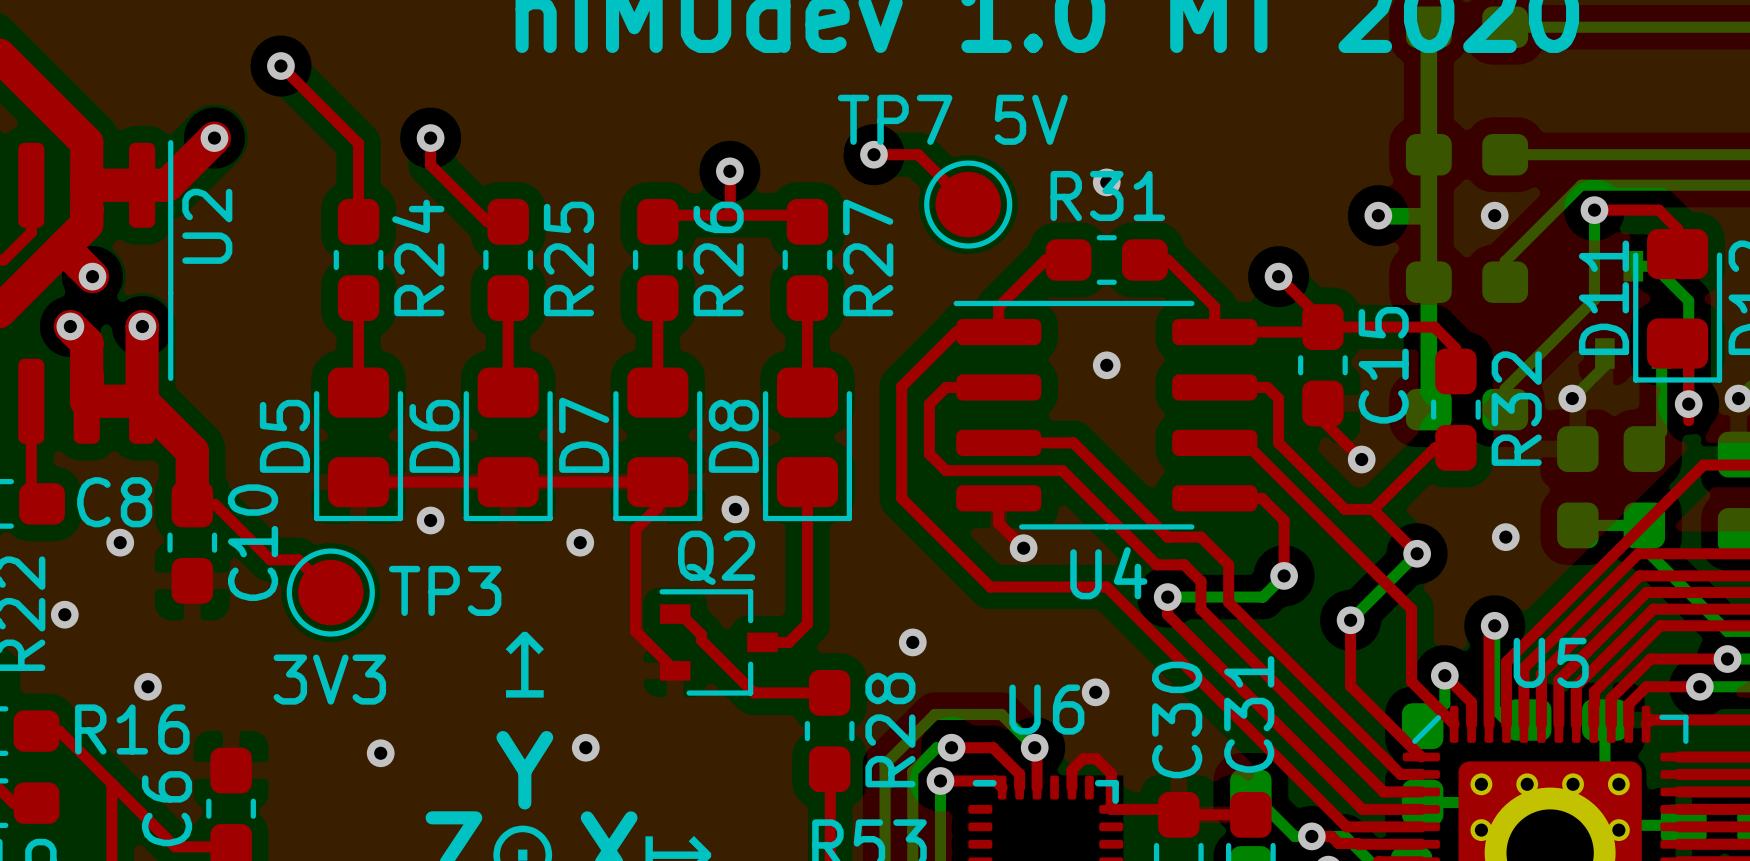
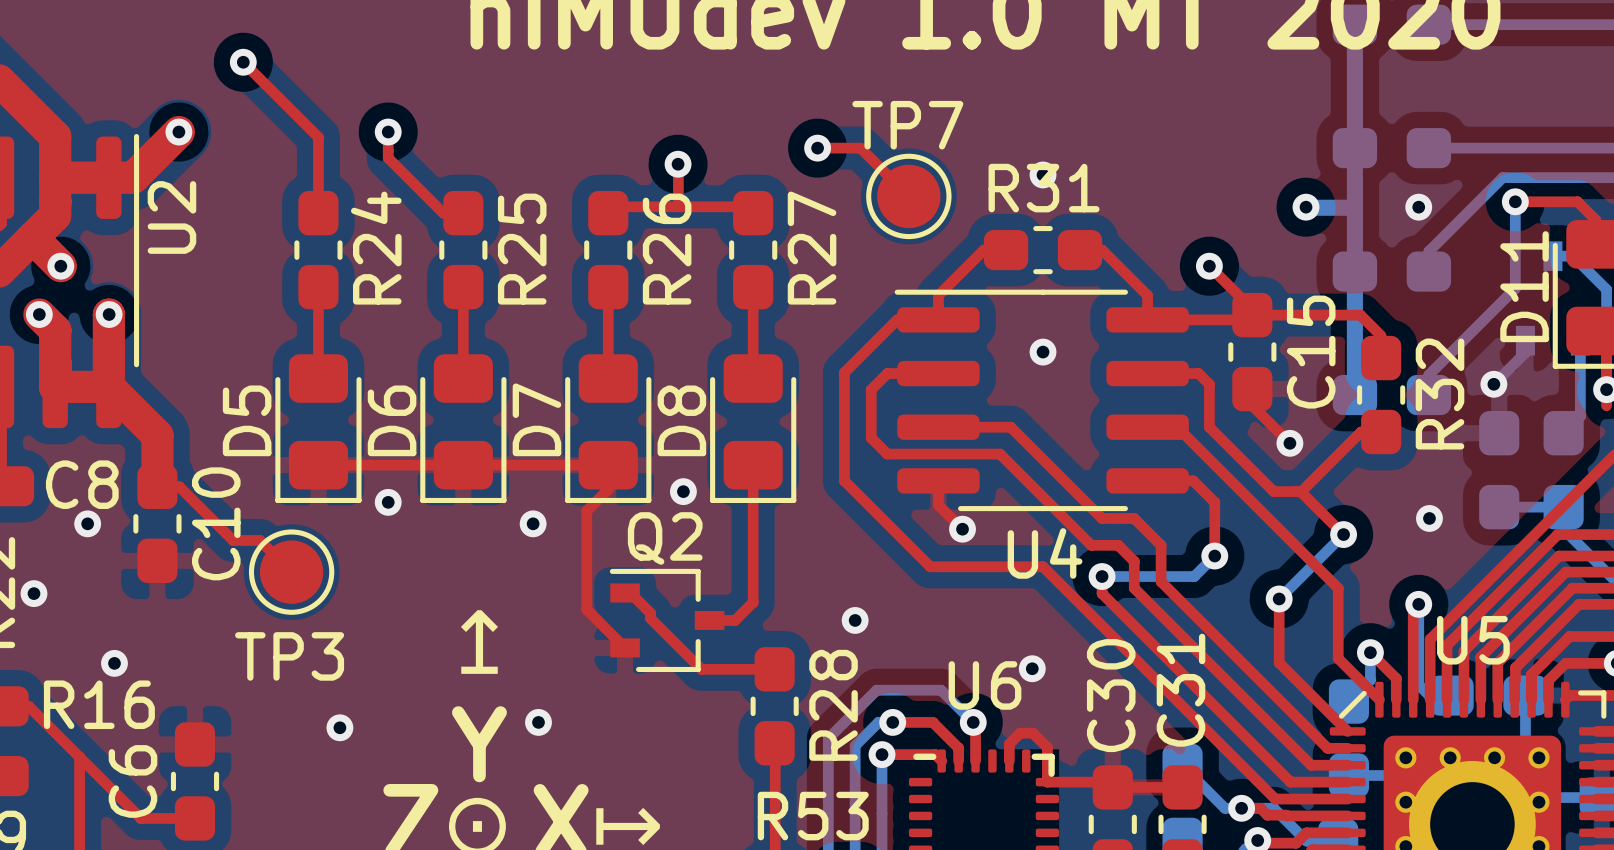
TP7 name position: TP7 (895, 119) -> TP7 (907, 125)
TP7 value: 5V (1031, 119) -> none
TP3 name position: TP3 (445, 590) -> TP3 (289, 656)
TP3 value: 3V3 (329, 679) -> none

